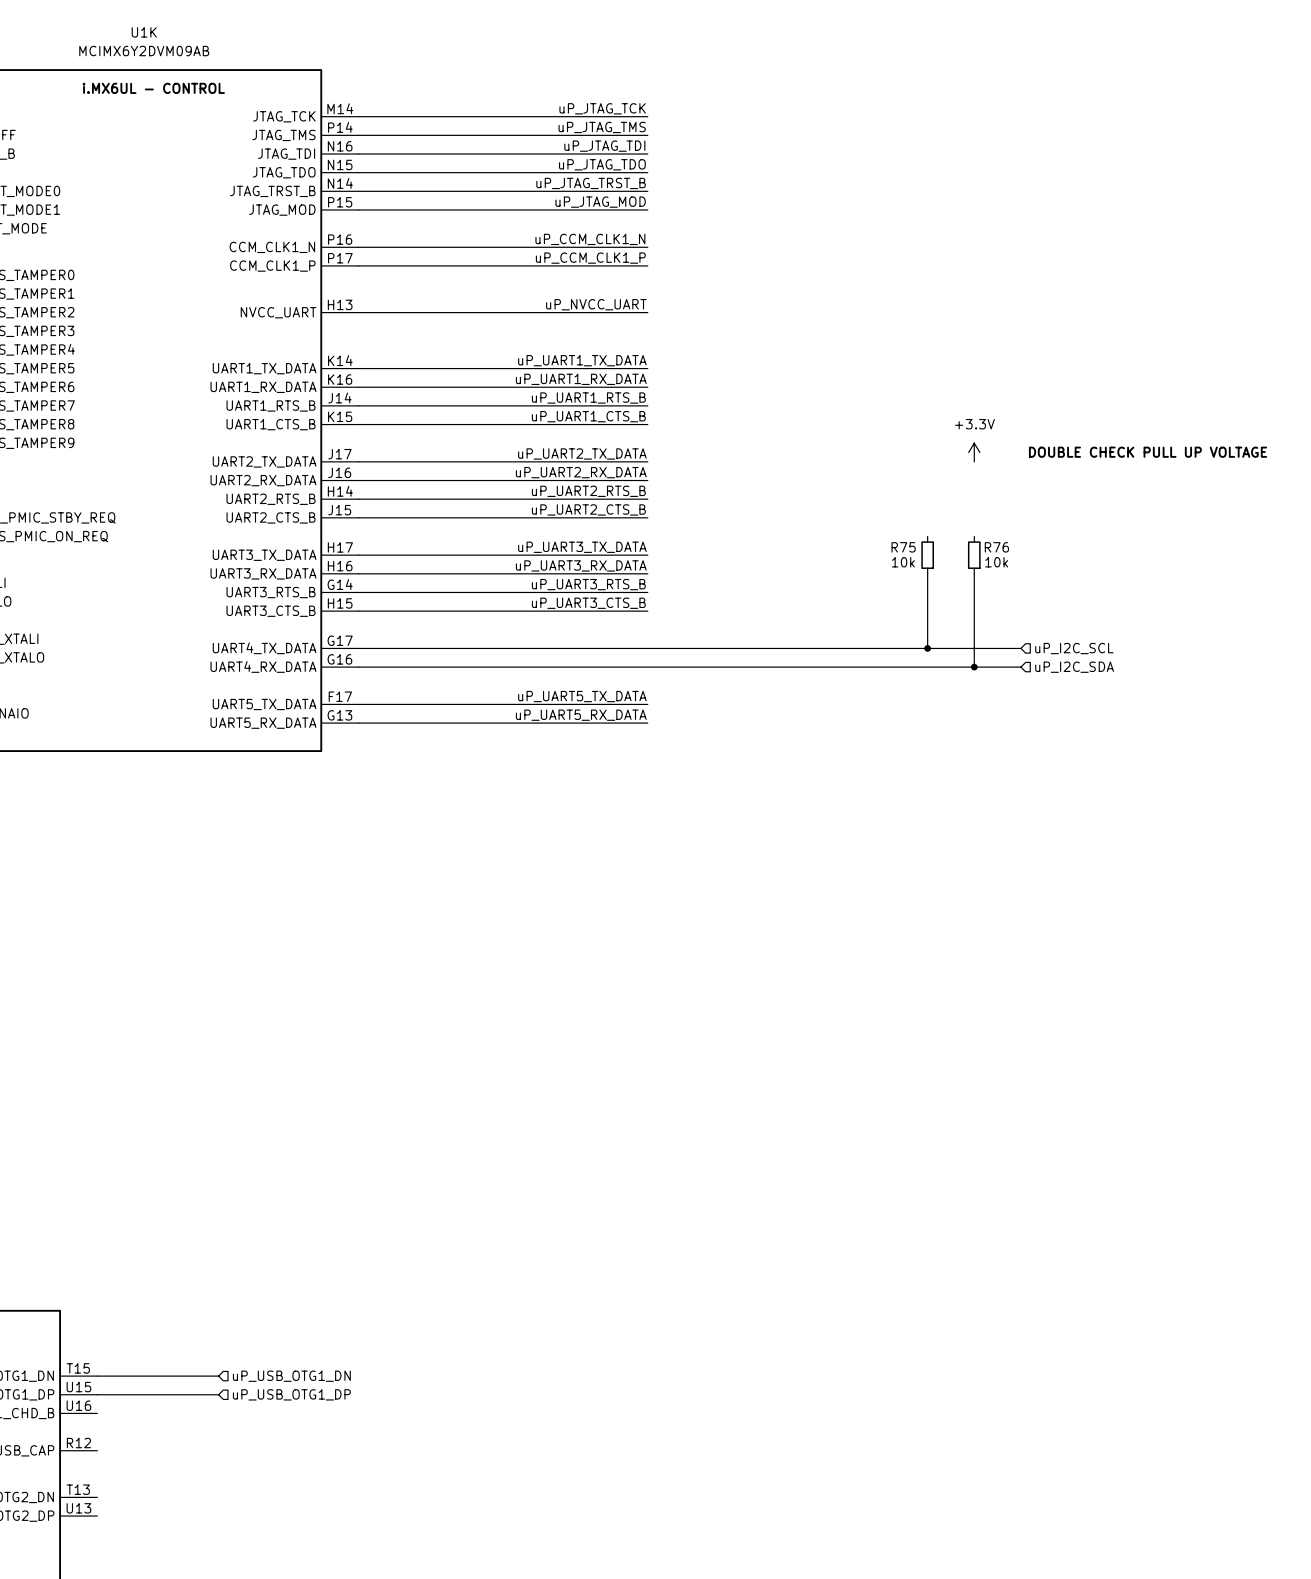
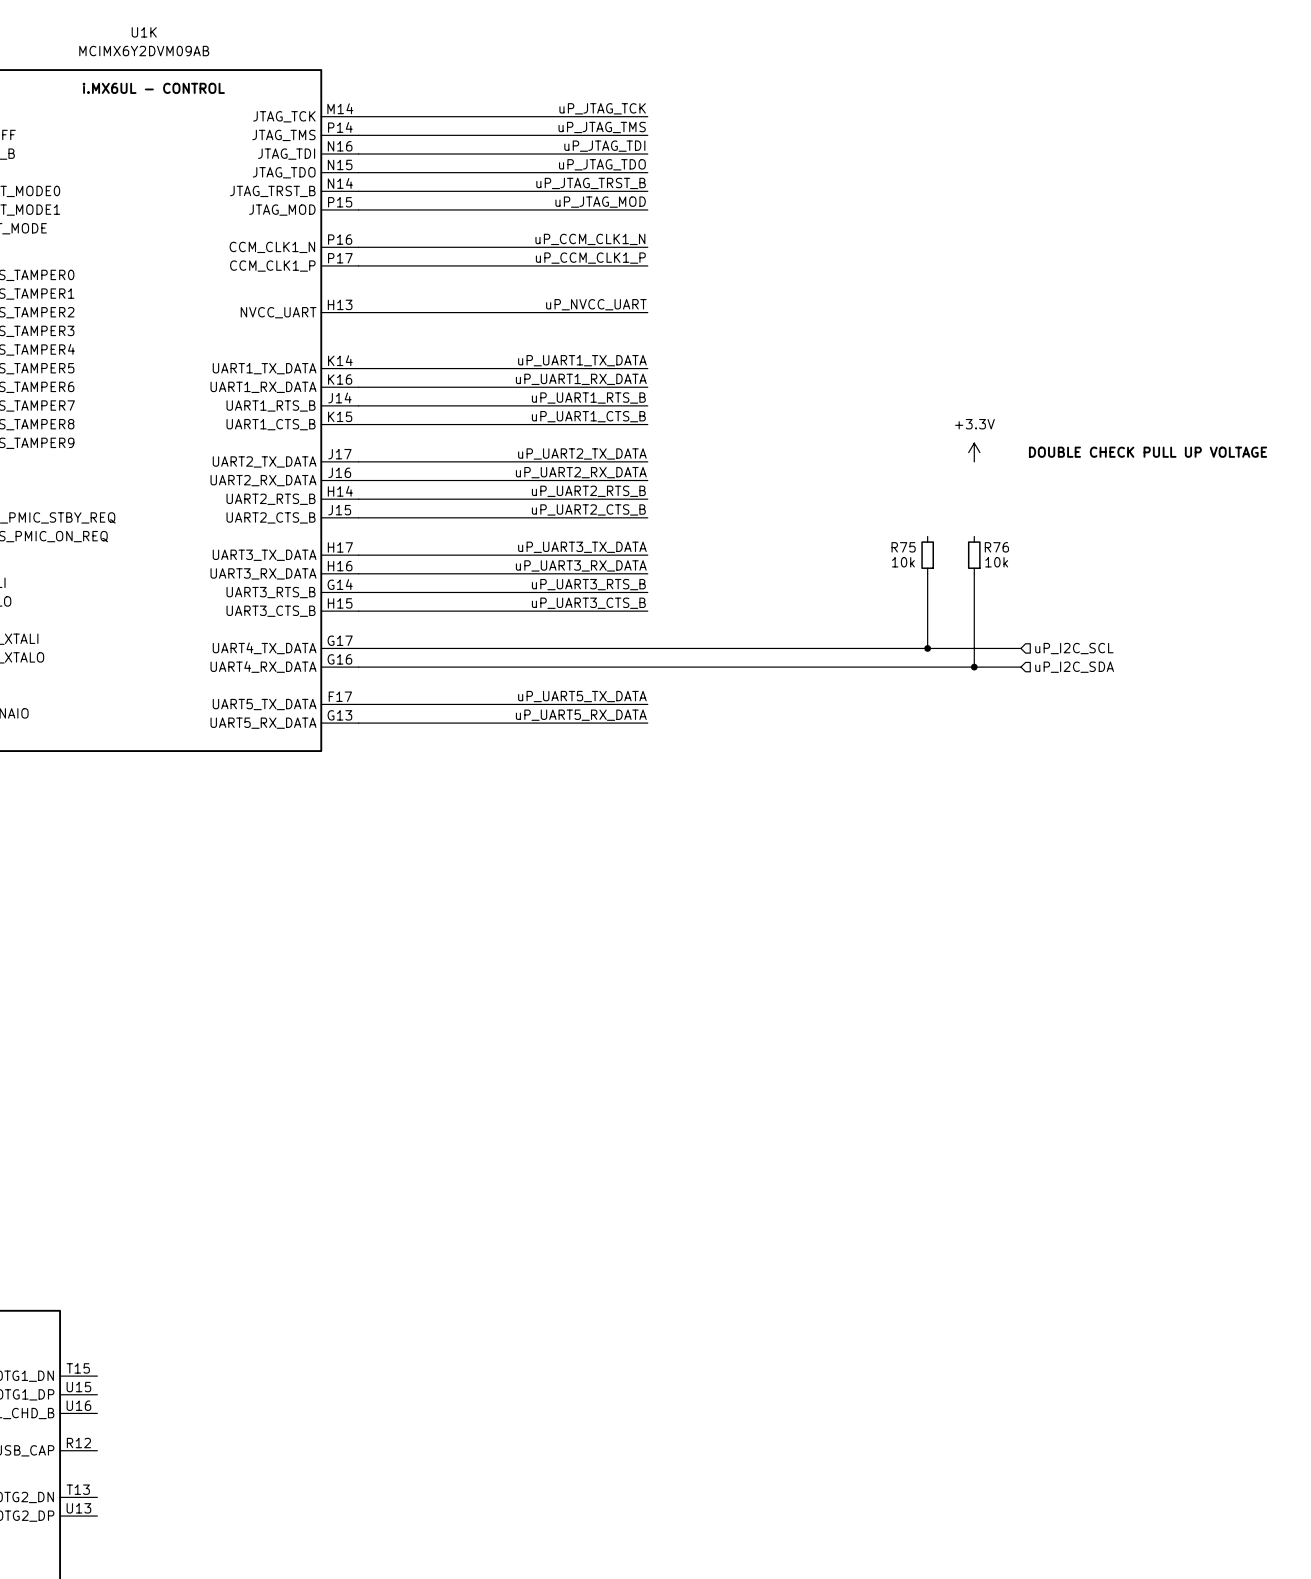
wire: (97, 1376) (218, 1376) -> none
hierarchical label: uP_USB_OTG1_DN (291, 1376) -> none
wire: (97, 1394) (218, 1394) -> none
hierarchical label: uP_USB_OTG1_DP (291, 1394) -> none

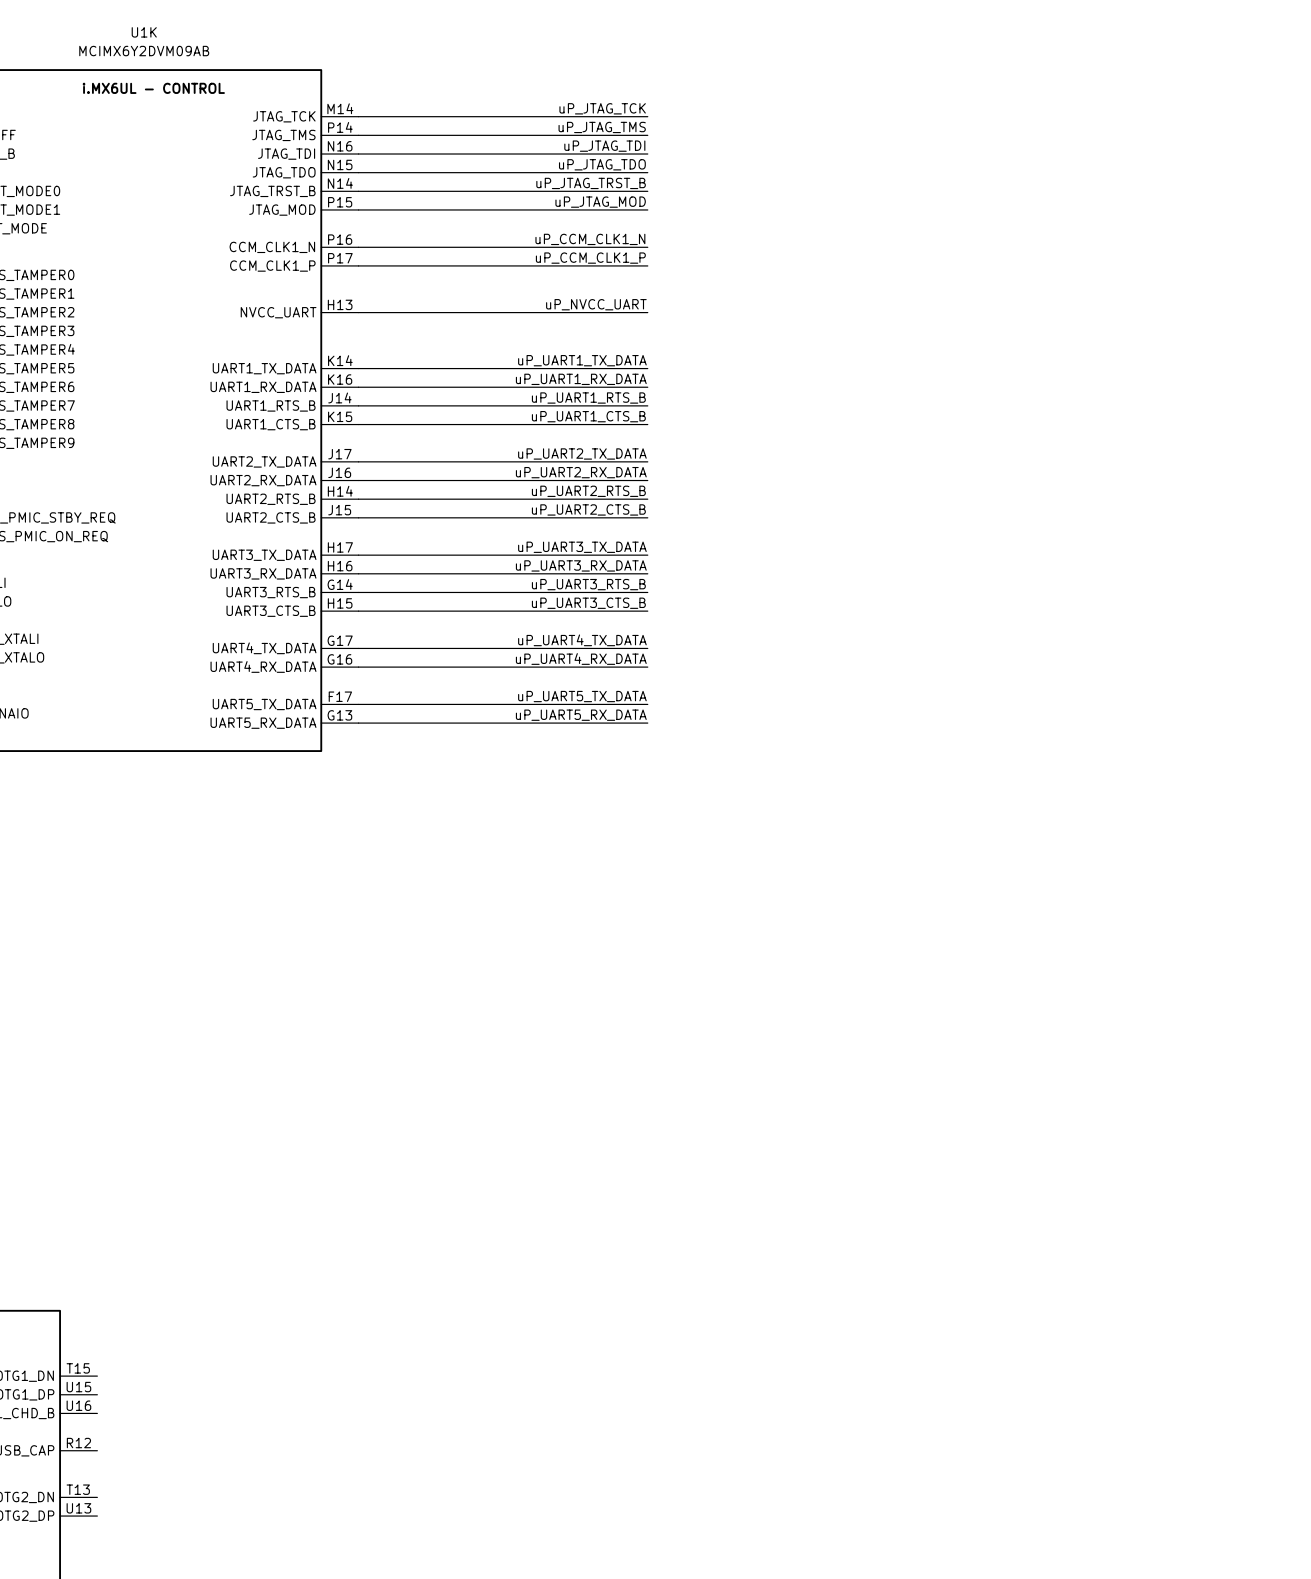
power symbol: +3.3V (974, 452) -> none
text: DOUBLE CHECK PULL UP VOLTAGE (1148, 452) -> none
R75: 10k (927, 555) -> none
R76: 10k (974, 555) -> none
wire: (927, 573) (927, 648) -> none
wire: (974, 573) (974, 667) -> none
label: none -> uP_UART4_TX_DATA (582, 640)
wire: (647, 648) (1020, 648) -> none
junction: (927, 648) -> none
hierarchical label: uP_I2C_SCL (1074, 648) -> none
label: none -> uP_UART4_RX_DATA (581, 658)
wire: (647, 667) (1020, 667) -> none
junction: (974, 667) -> none
hierarchical label: uP_I2C_SDA (1074, 667) -> none

